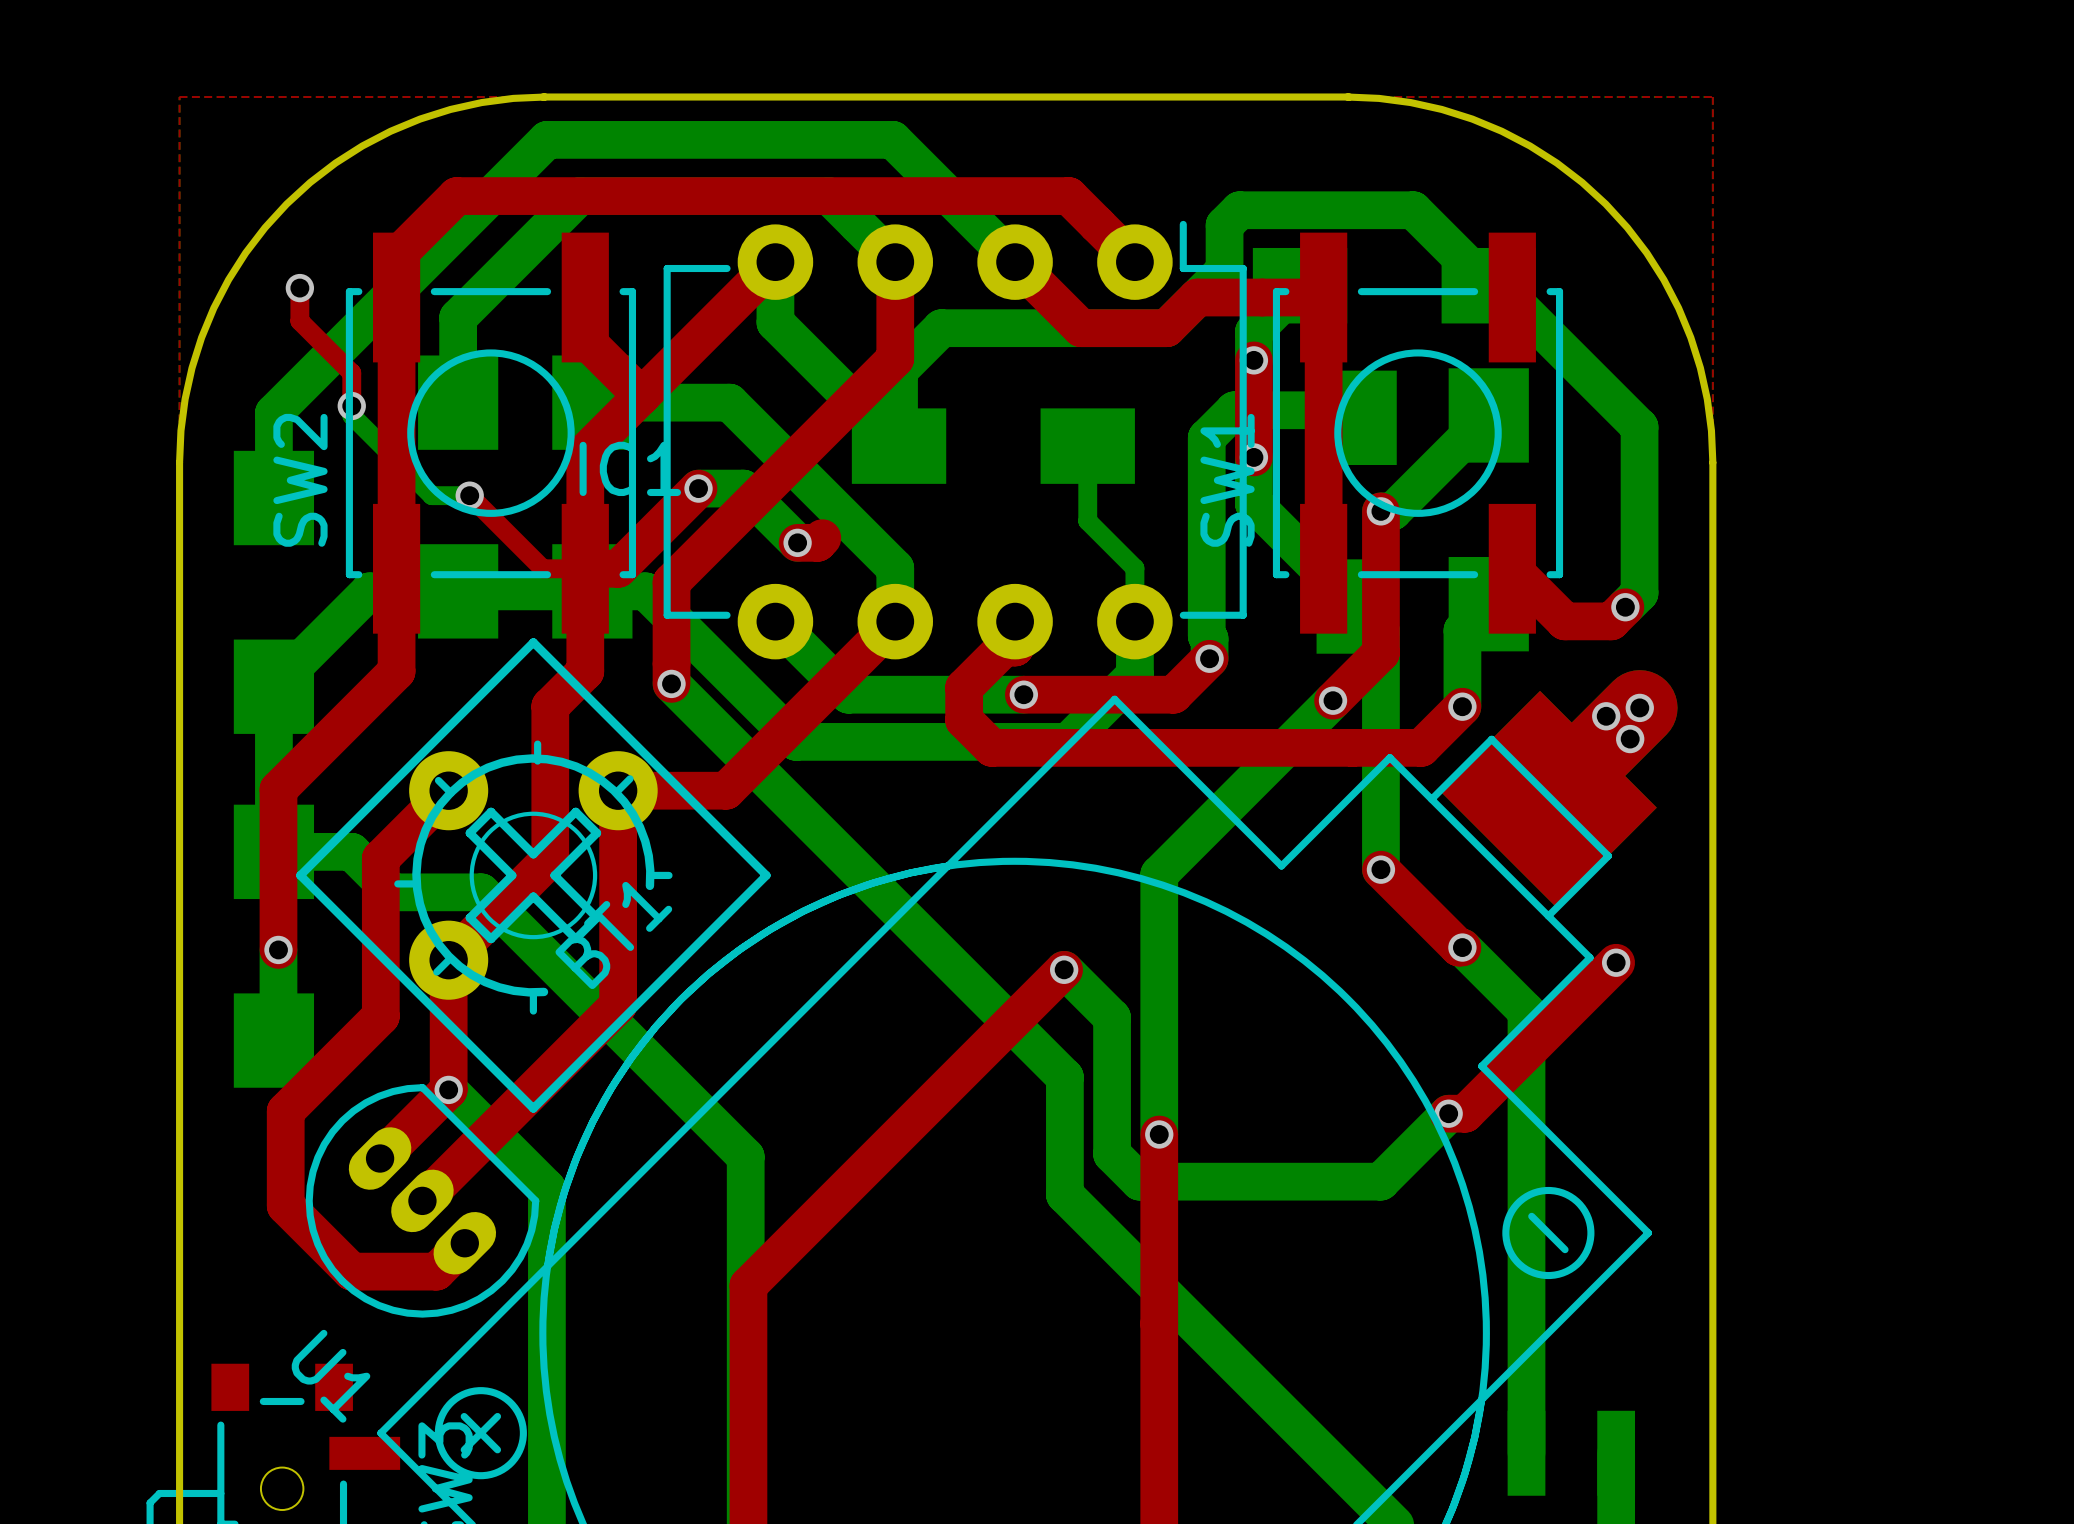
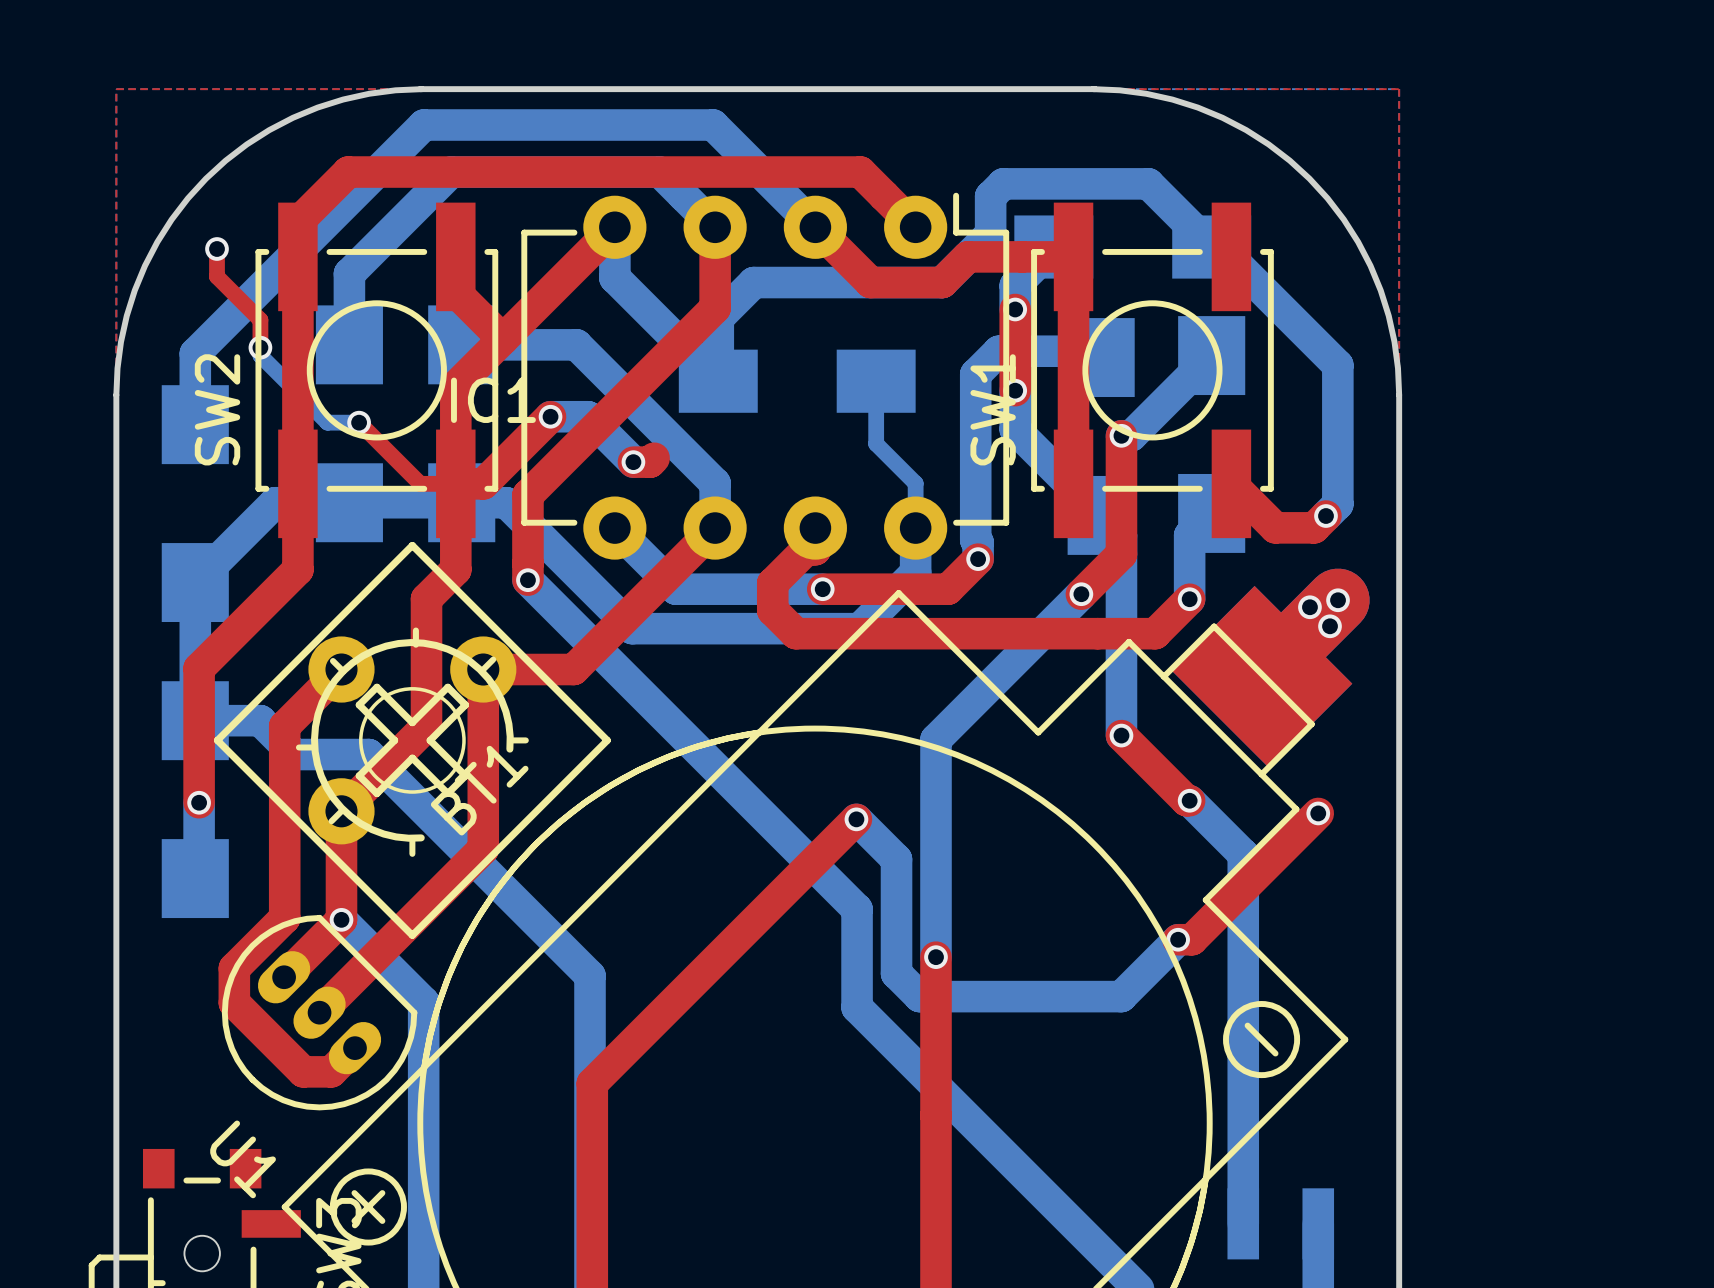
top track: (380, 1016) (285, 1111) (285, 1205) (351, 1271) (403, 1271) -> (284, 858) (284, 918) (234, 968) (234, 1002) (303, 1071)

